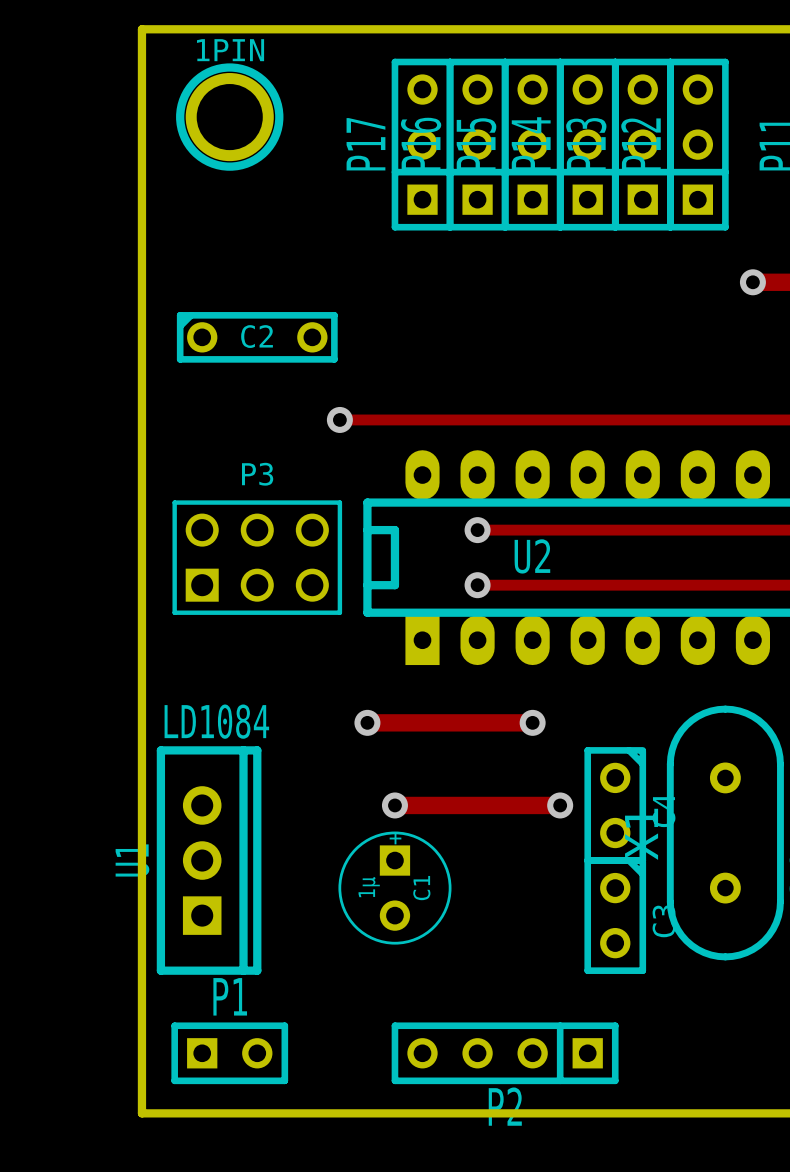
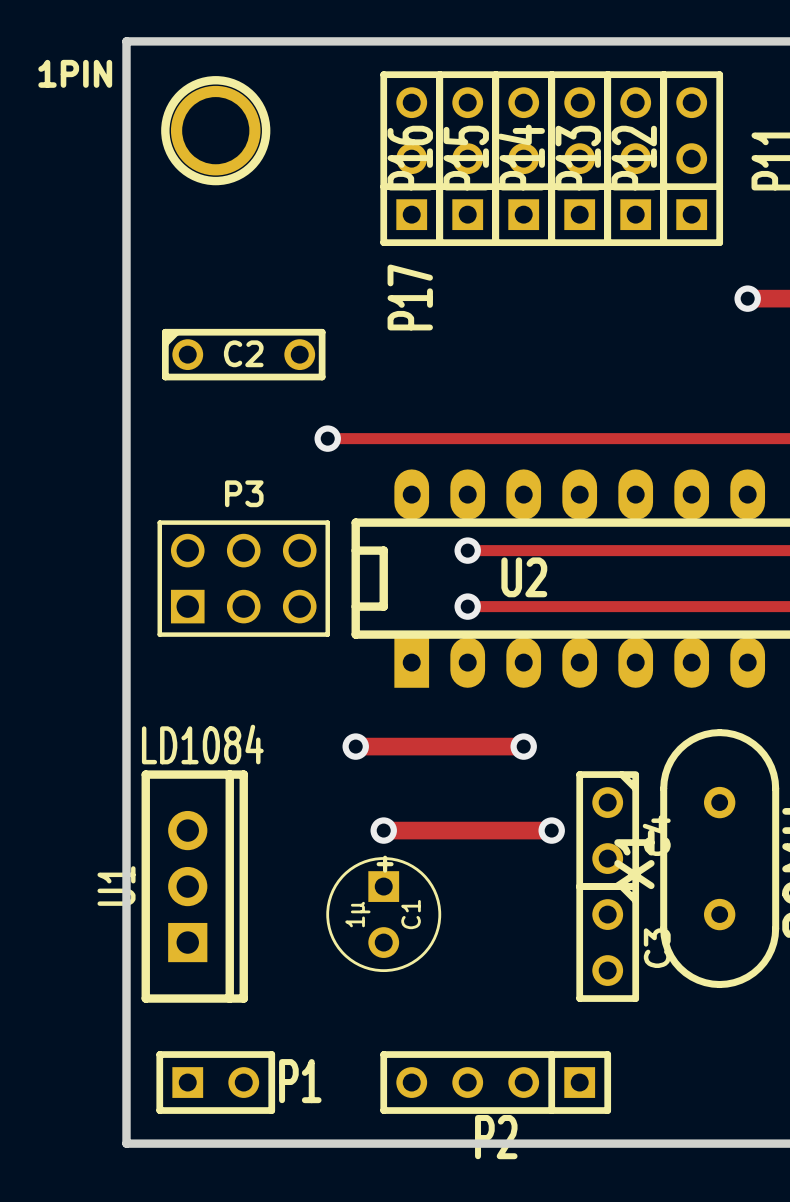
1PIN name position: 1PIN (230, 50) -> 1PIN (75, 73)
P17 name position: P17 (365, 144) -> P17 (410, 297)
P1 name position: P1 (230, 996) -> P1 (300, 1081)

